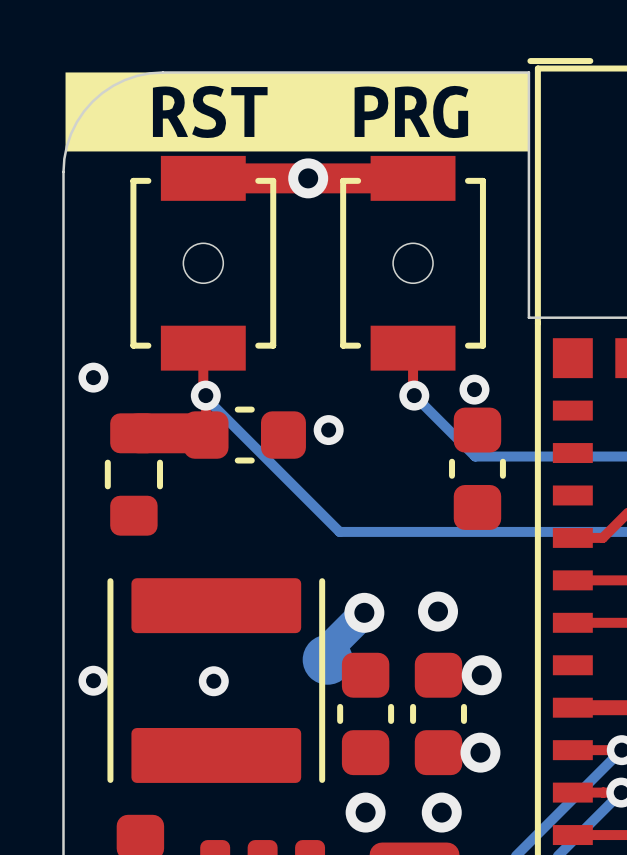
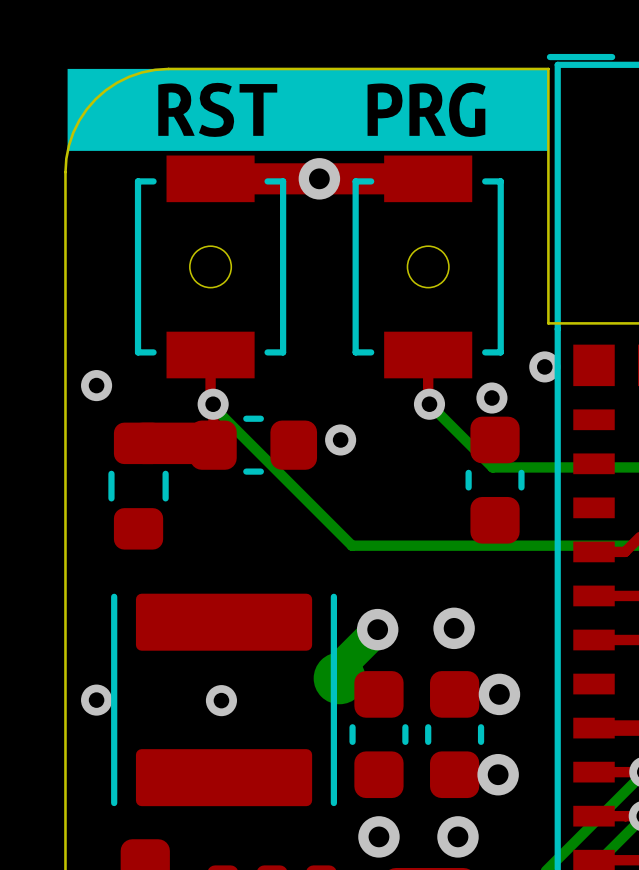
via: none -> (544, 366)

